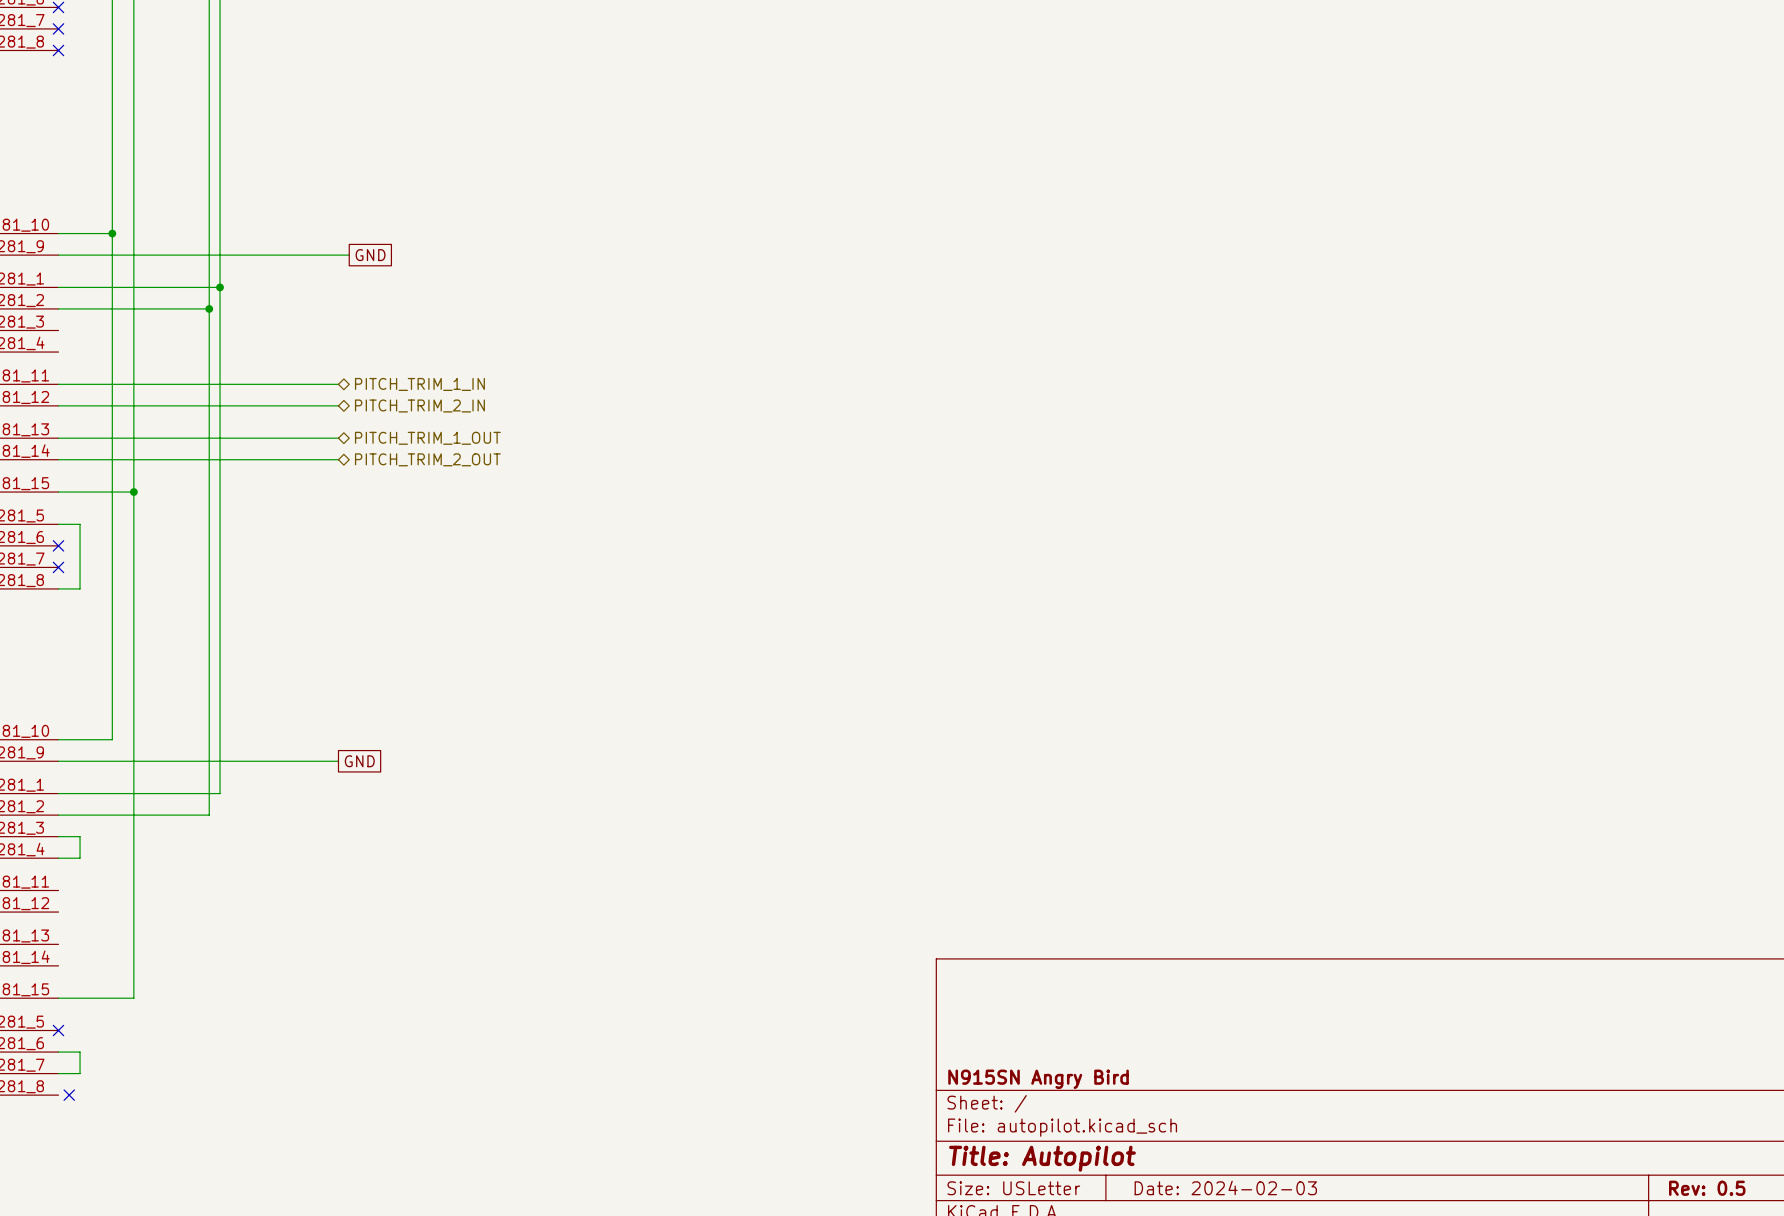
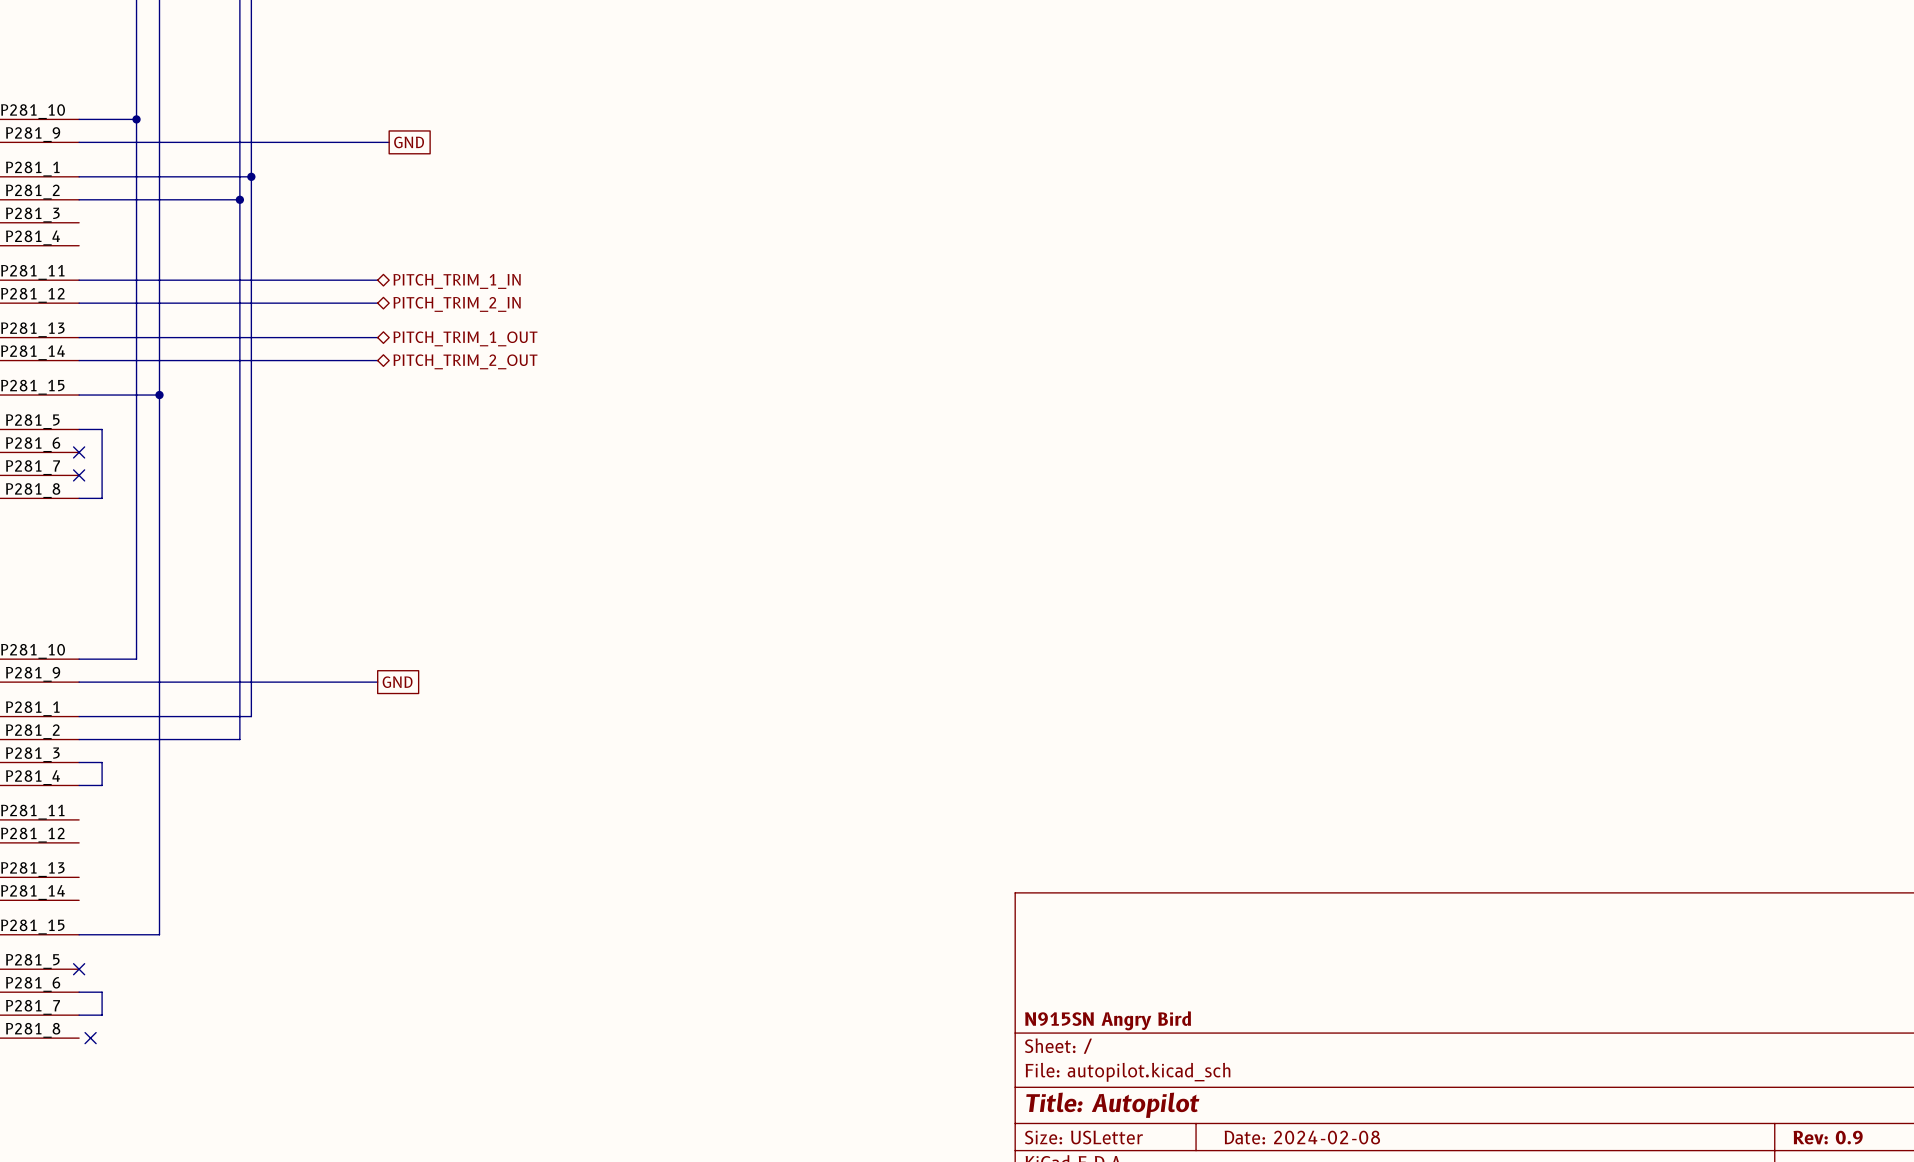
title block: Date: 2024-02-03 (1225, 1187) -> Date: 2024-02-08 (1302, 1137)
title block: Rev: 0.5 (1707, 1188) -> Rev: 0.9 (1828, 1137)

